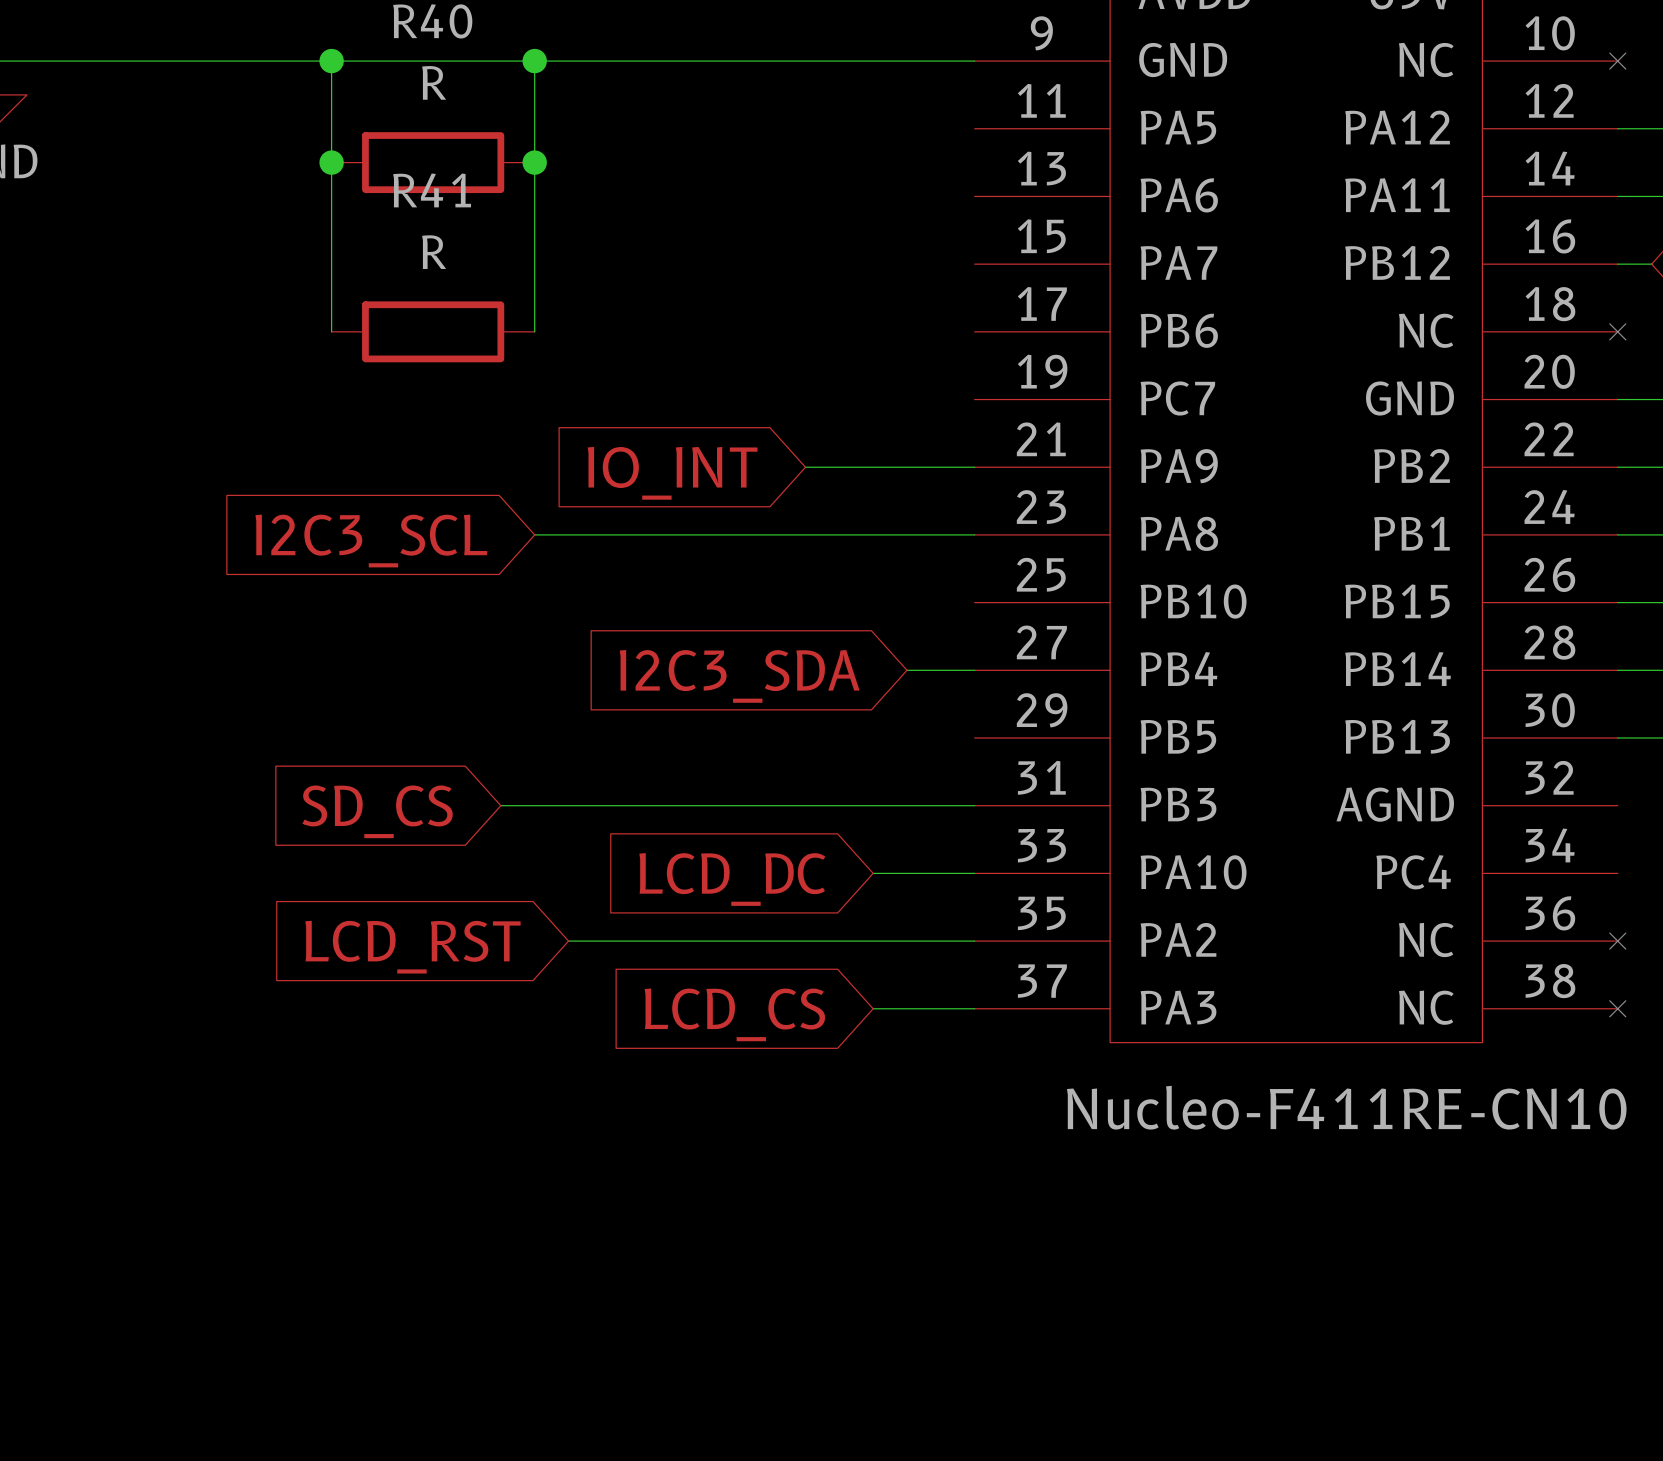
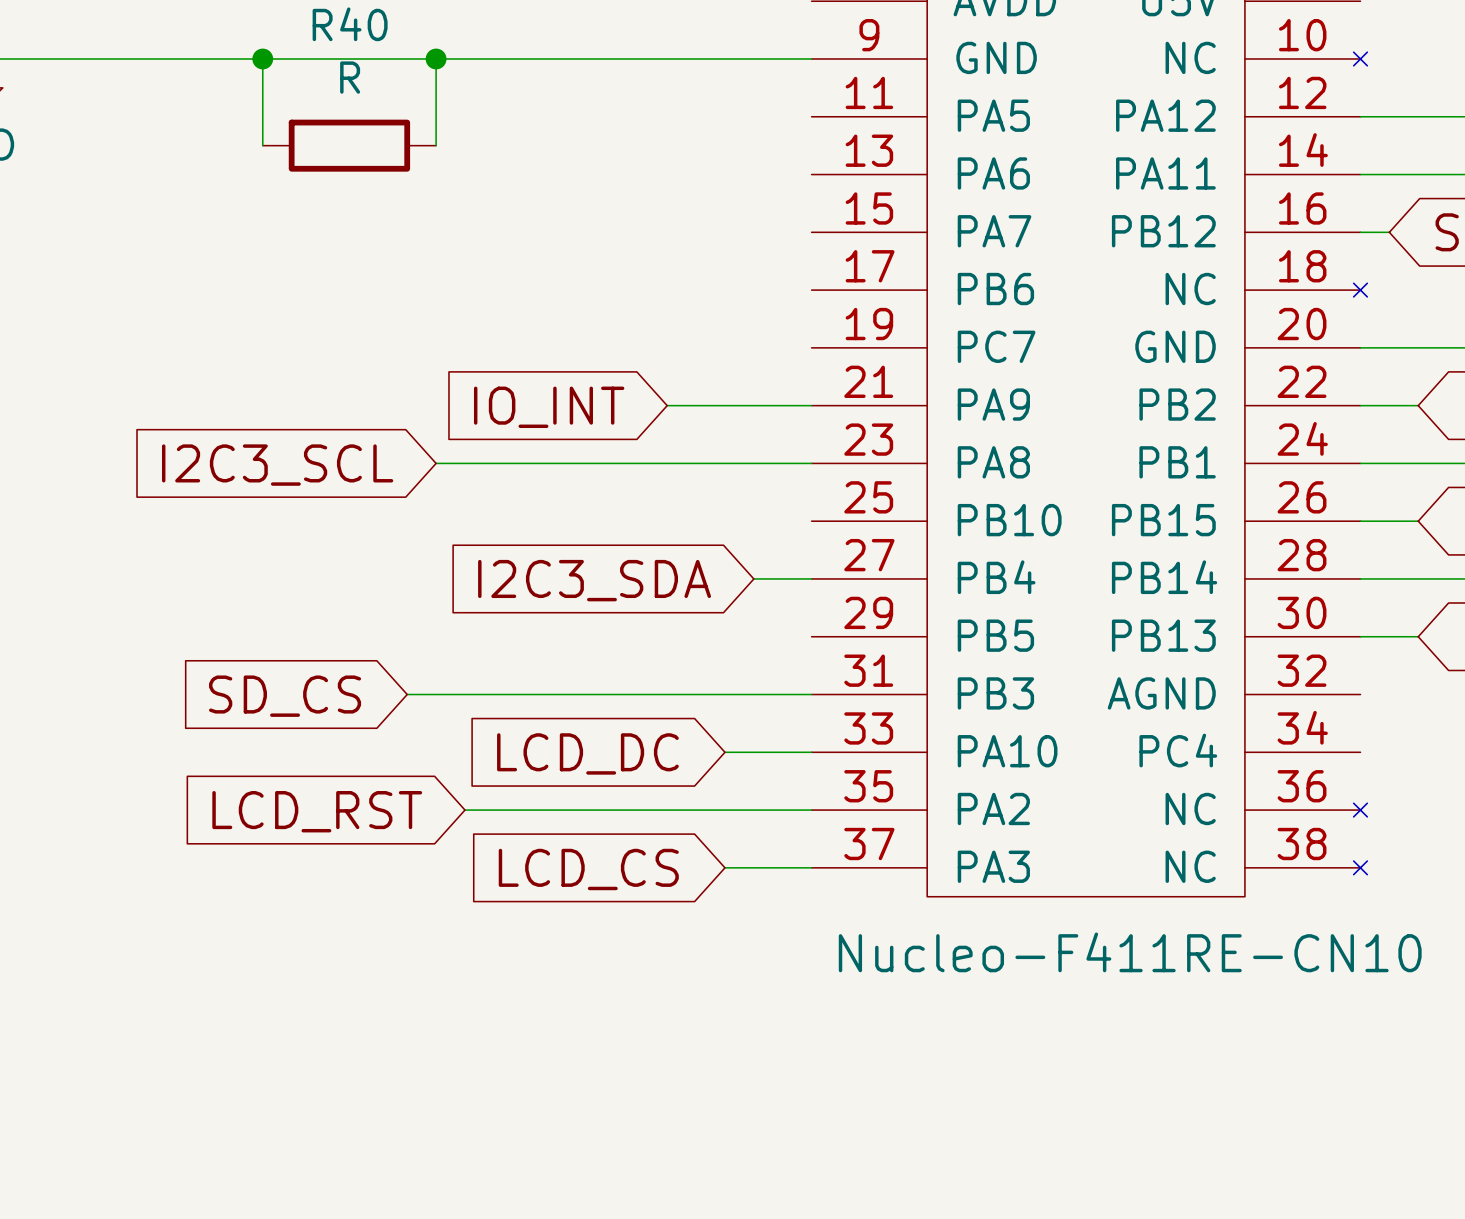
wire: (331, 162) (331, 331) -> none
junction: (331, 162) -> none
wire: (534, 162) (534, 331) -> none
junction: (534, 162) -> none
R41: R (433, 331) -> none

